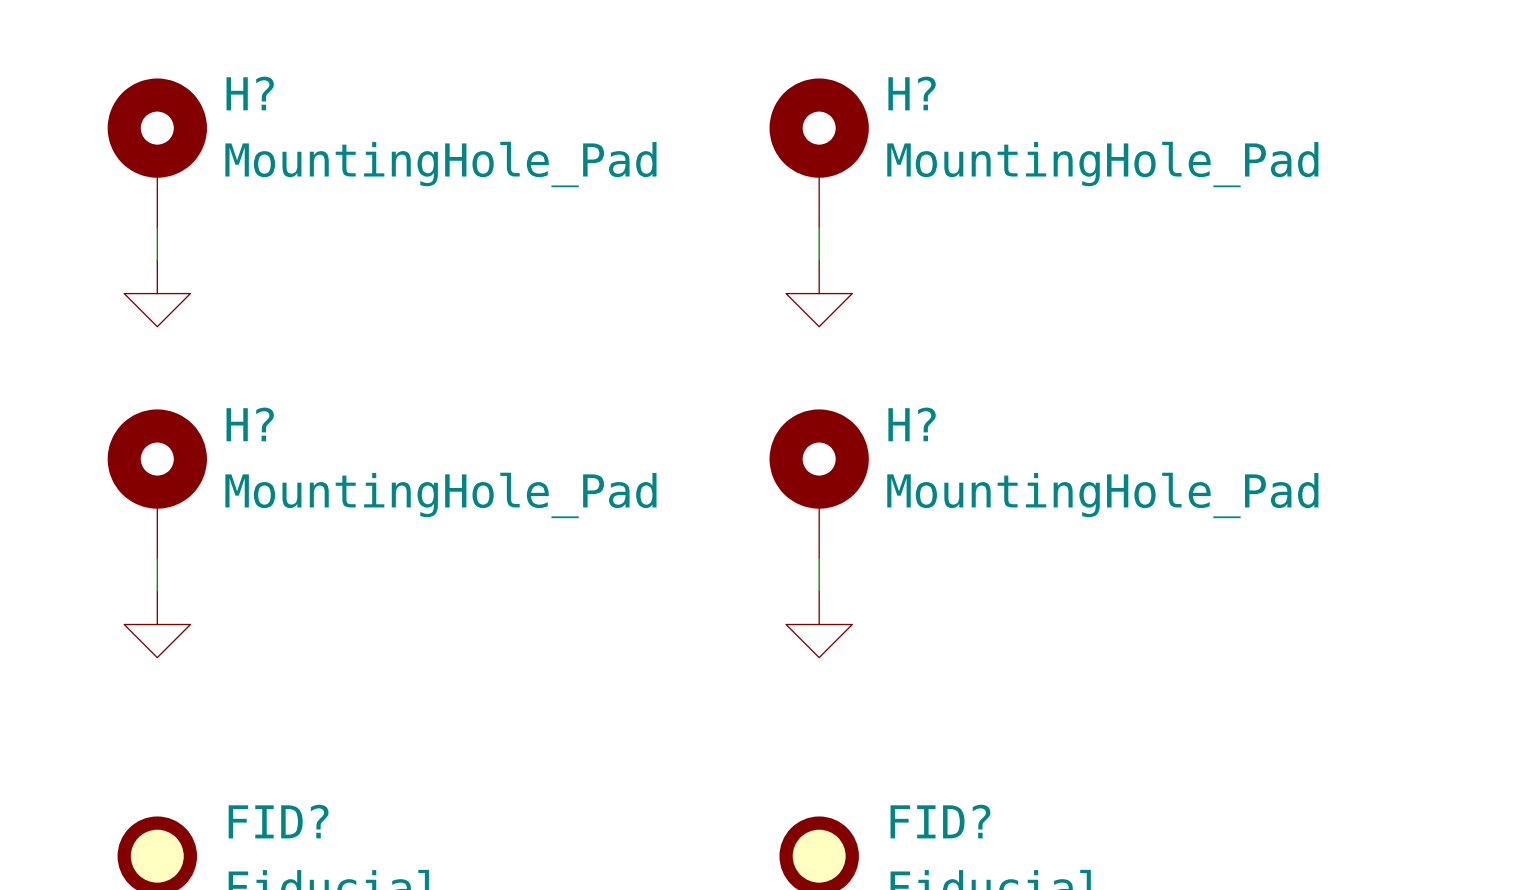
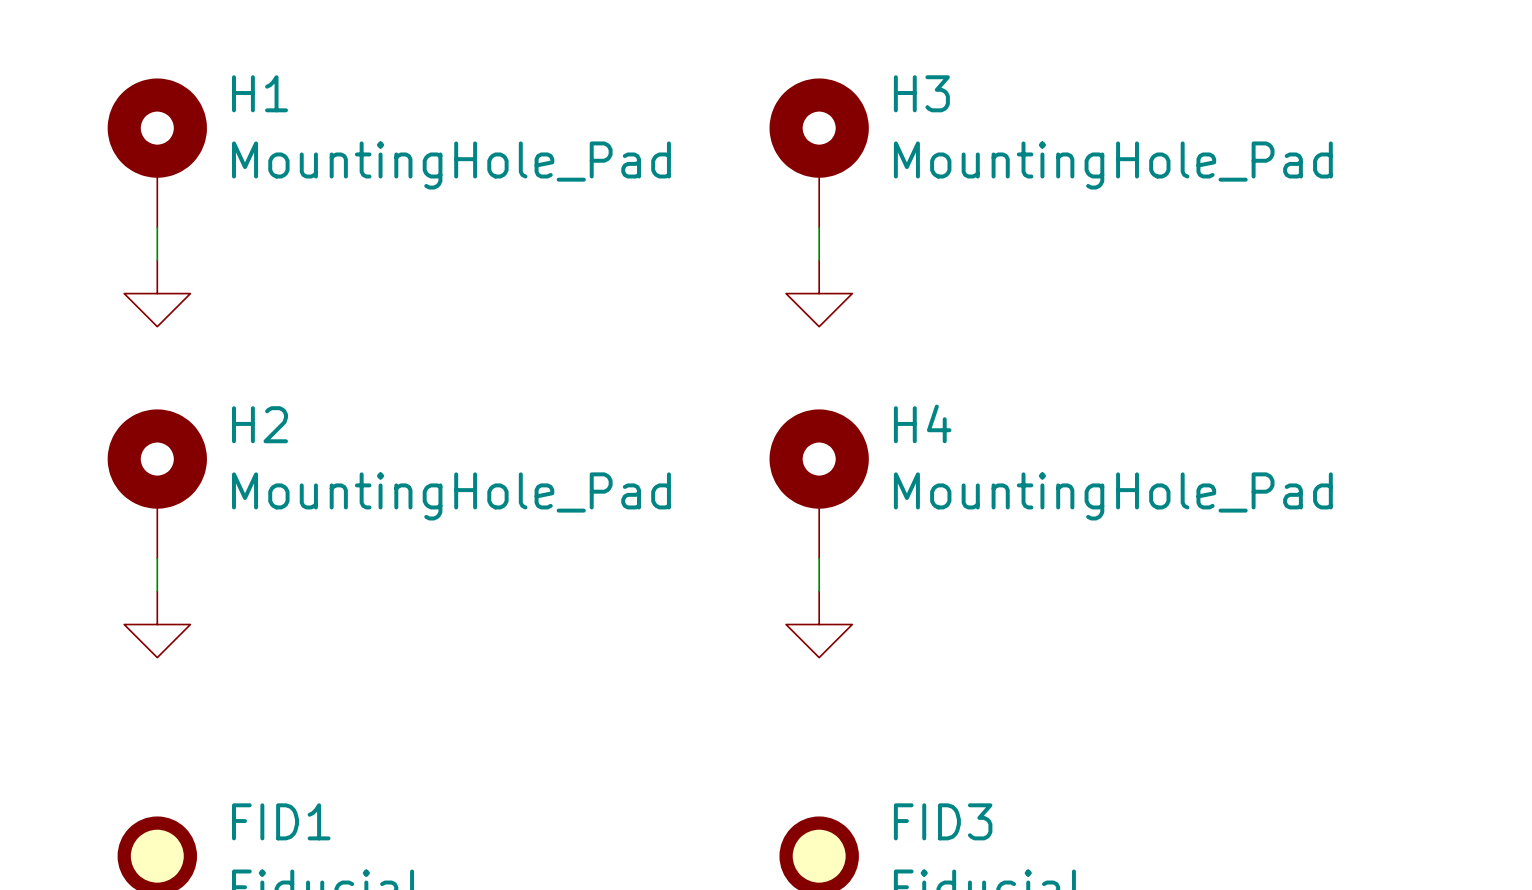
H? name: H? (250, 93) -> H1 (259, 93)
H? name: H? (912, 93) -> H3 (921, 93)
H? name: H? (250, 424) -> H2 (259, 424)
H? name: H? (912, 424) -> H4 (922, 423)
FID? name: FID? (278, 821) -> FID1 (281, 821)
FID? name: FID? (940, 821) -> FID3 (943, 821)

